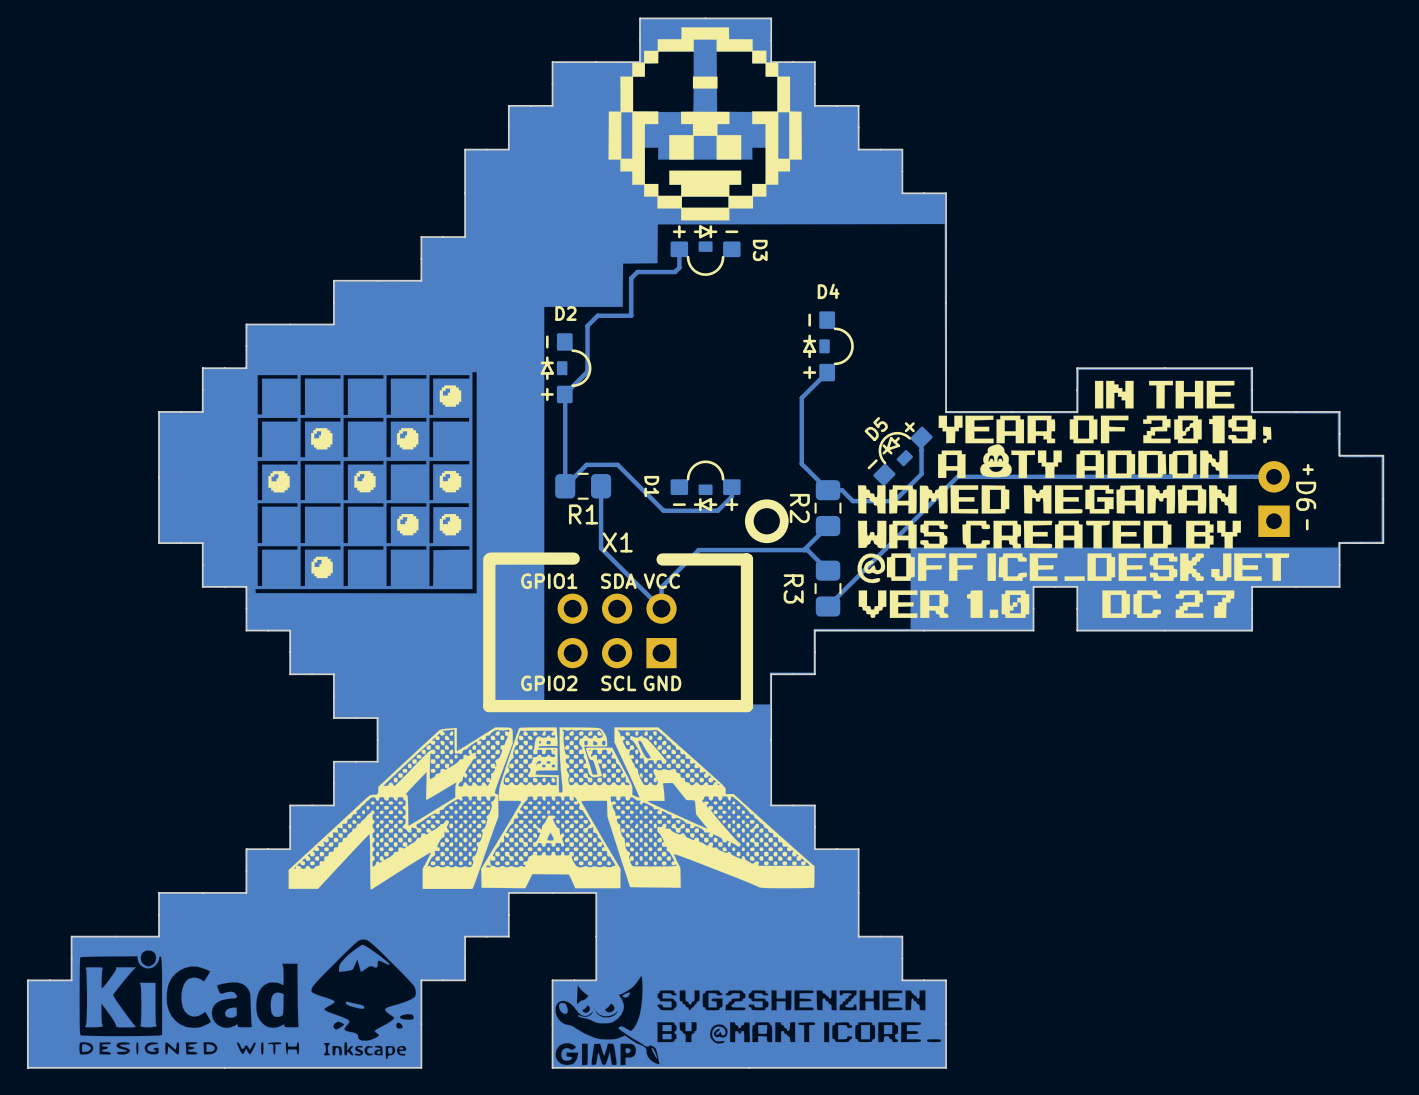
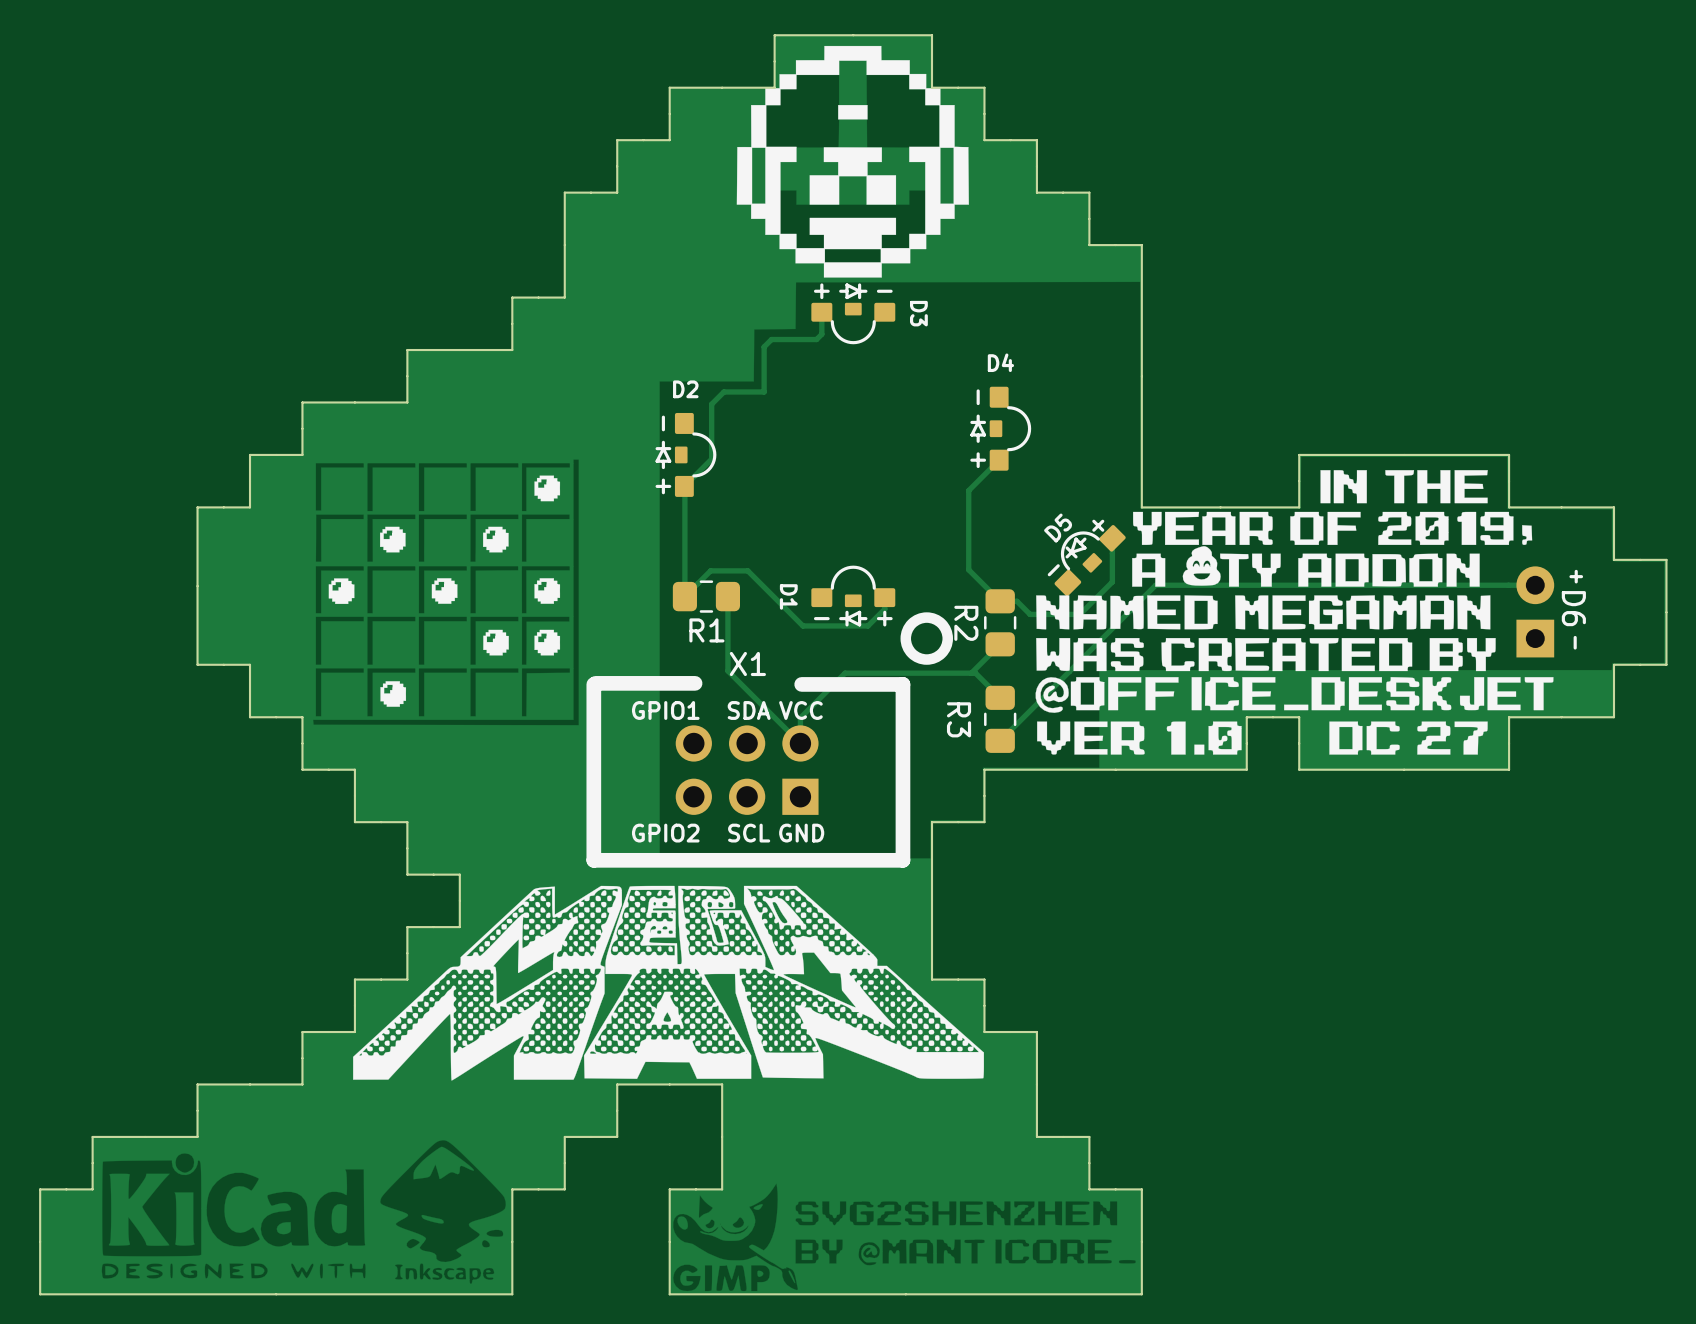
drawing shape: [268, 27, 1290, 890] -> [328, 45, 1554, 1081]

